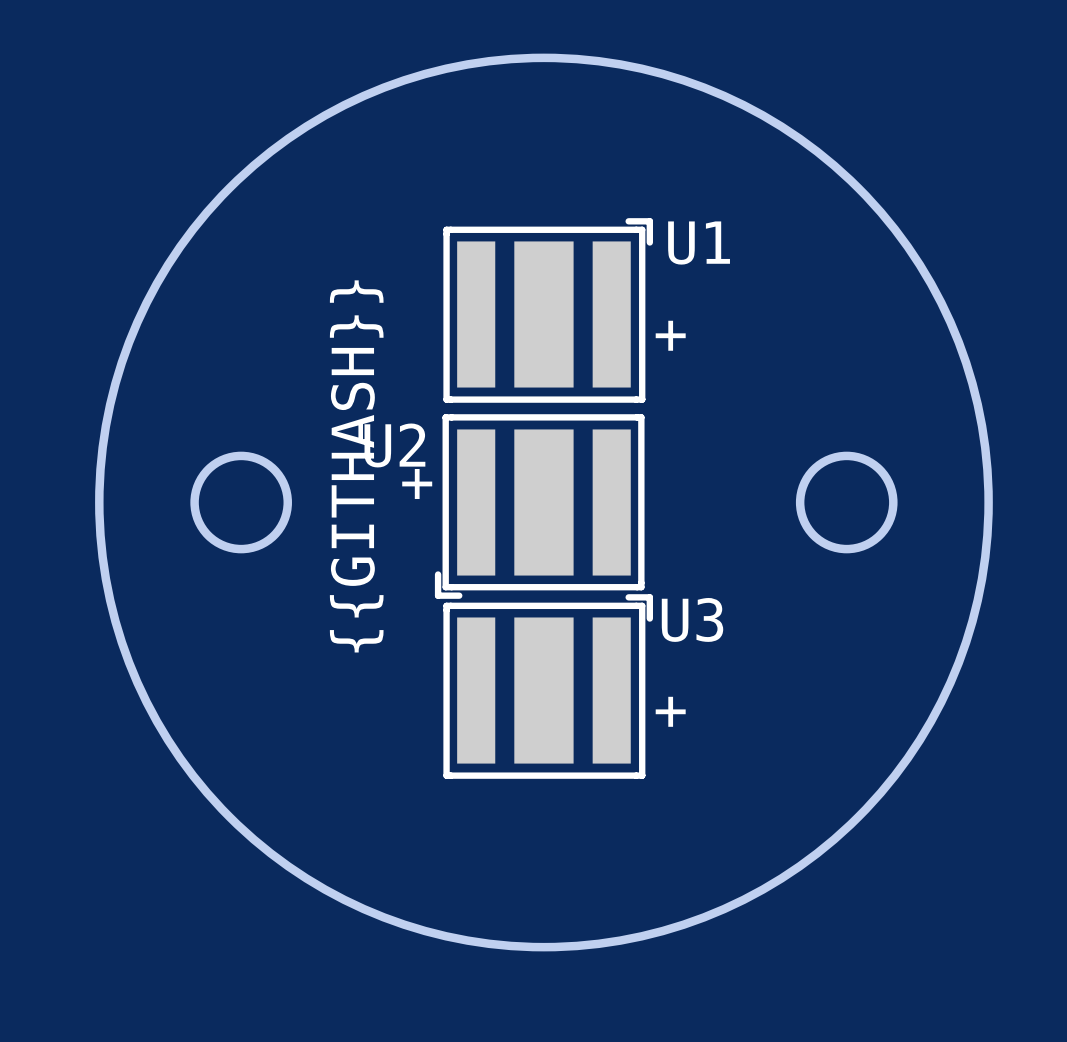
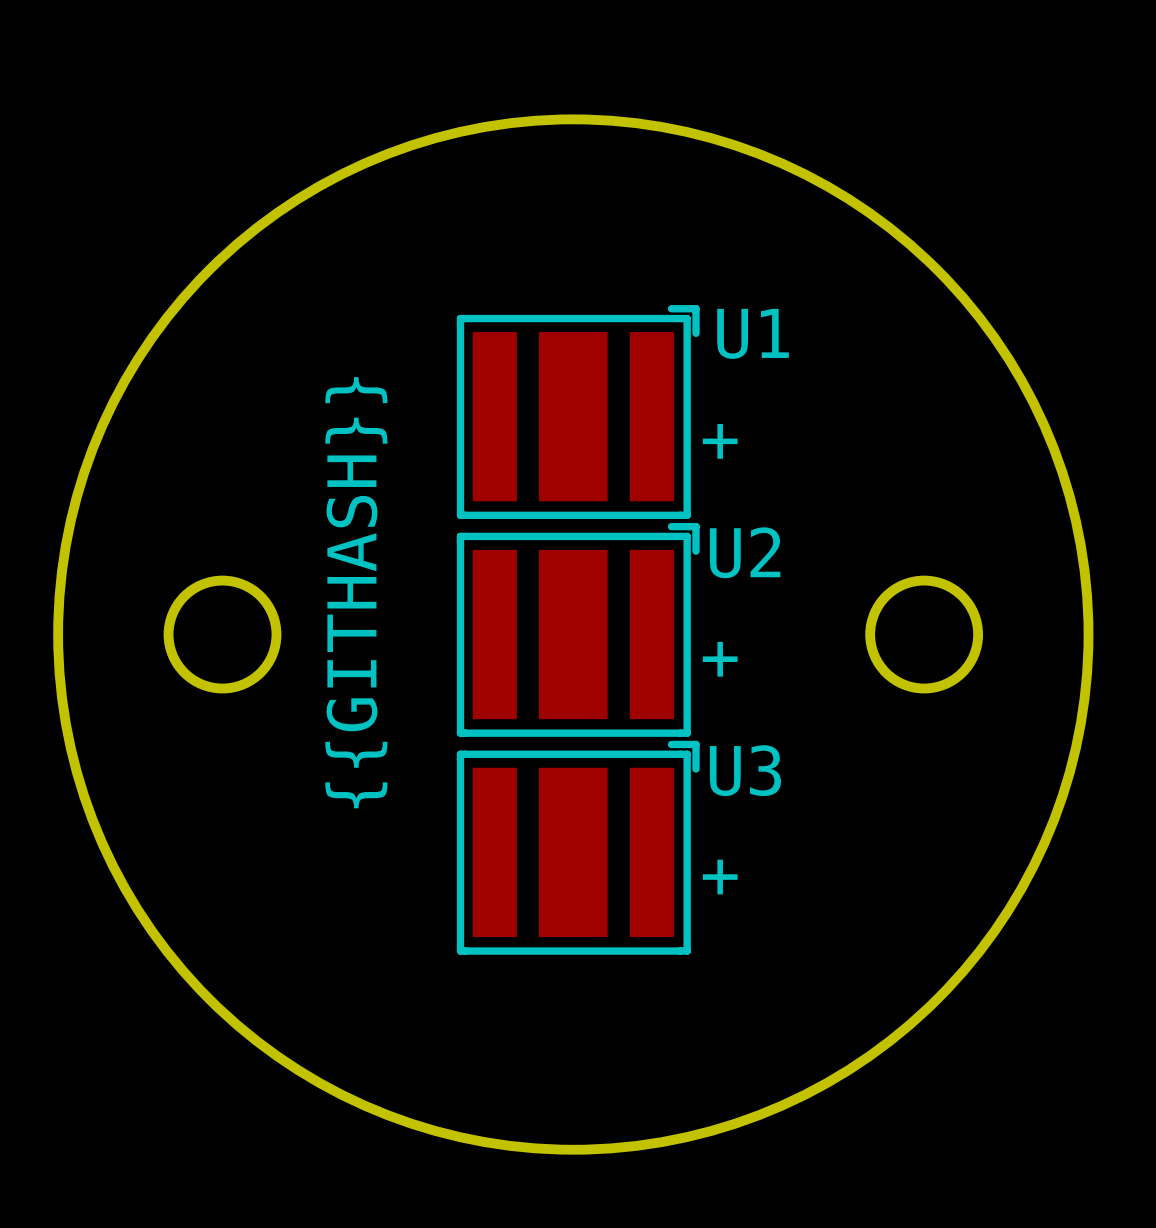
U2 name position: U2 (394, 445) -> U2 (745, 552)
U2 rotation: 0° (539, 506) -> 180° (578, 629)

